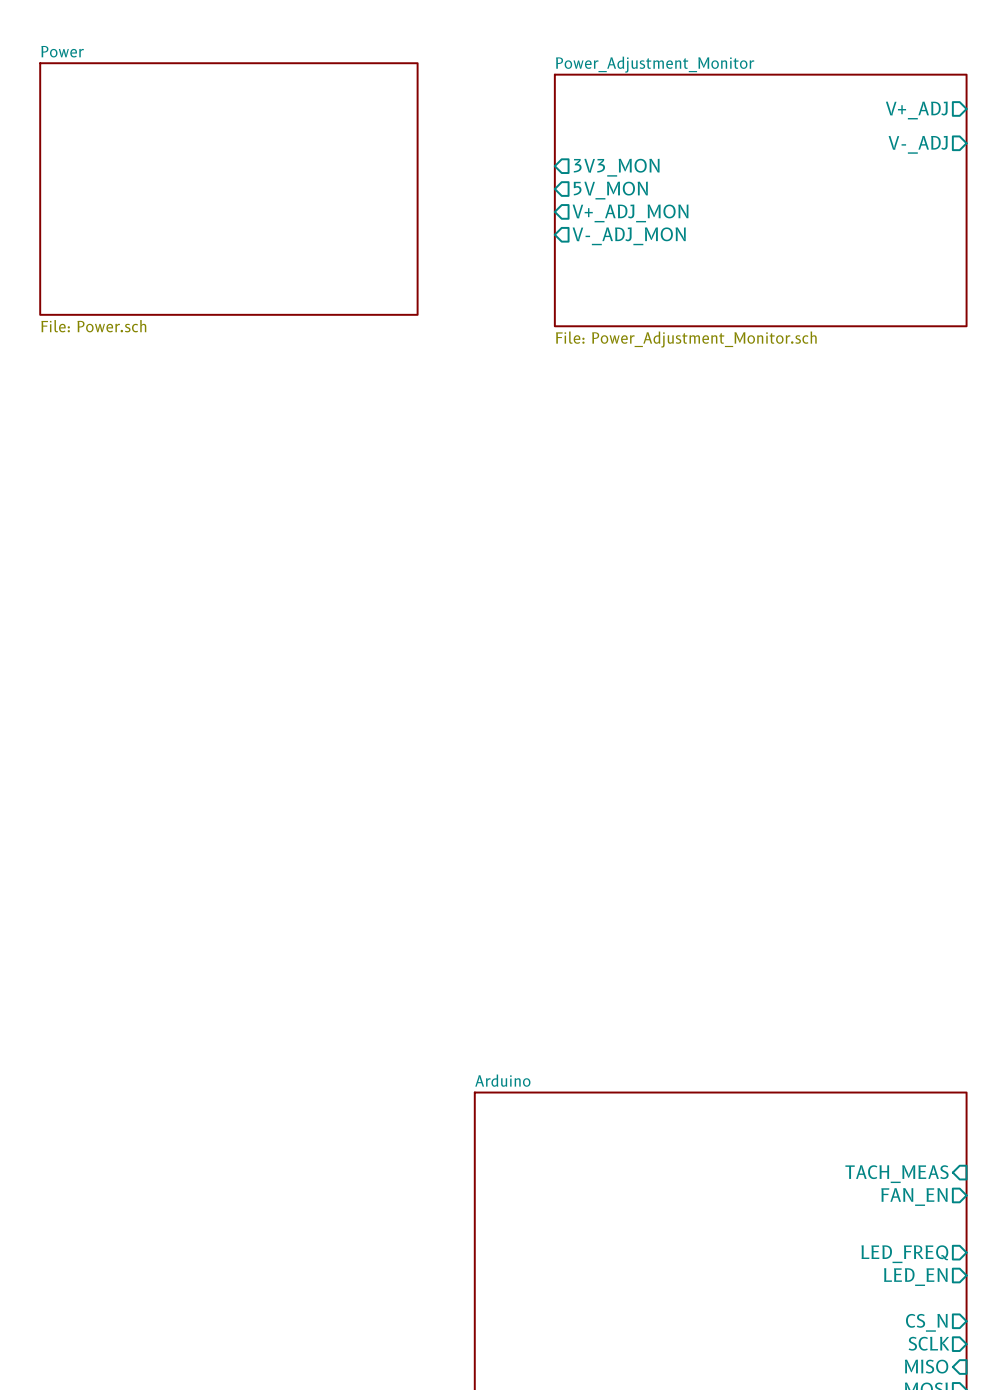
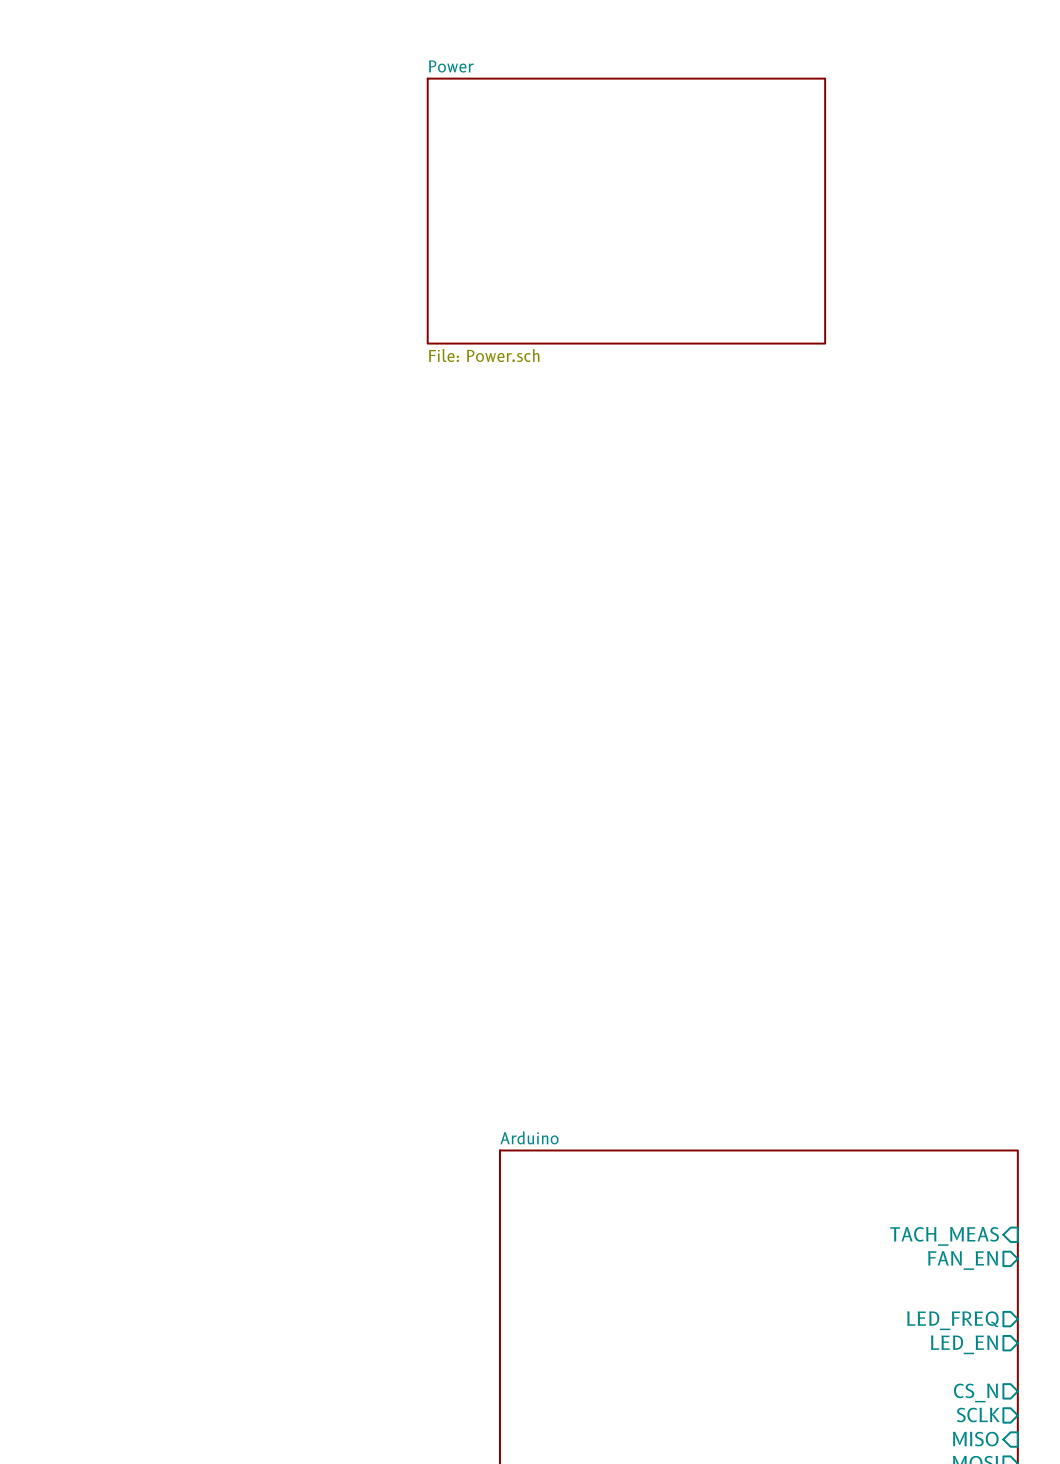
sheet pin: V+_ADJ (916, 110) -> none
sheet pin: V-_ADJ (918, 144) -> none
sheet pin: 3V3_MON (616, 167) -> none
sheet Power: File: Power.sch (228, 189) -> none
sheet pin: 5V_MON (610, 190) -> none
sheet Power: none -> File: Power.sch (626, 211)
sheet Power_Adjustment_Monitor: File: Power_Adjustment_Monitor.sch (760, 200) -> none
sheet pin: V+_ADJ_MON (630, 213) -> none
sheet pin: V-_ADJ_MON (629, 236) -> none

